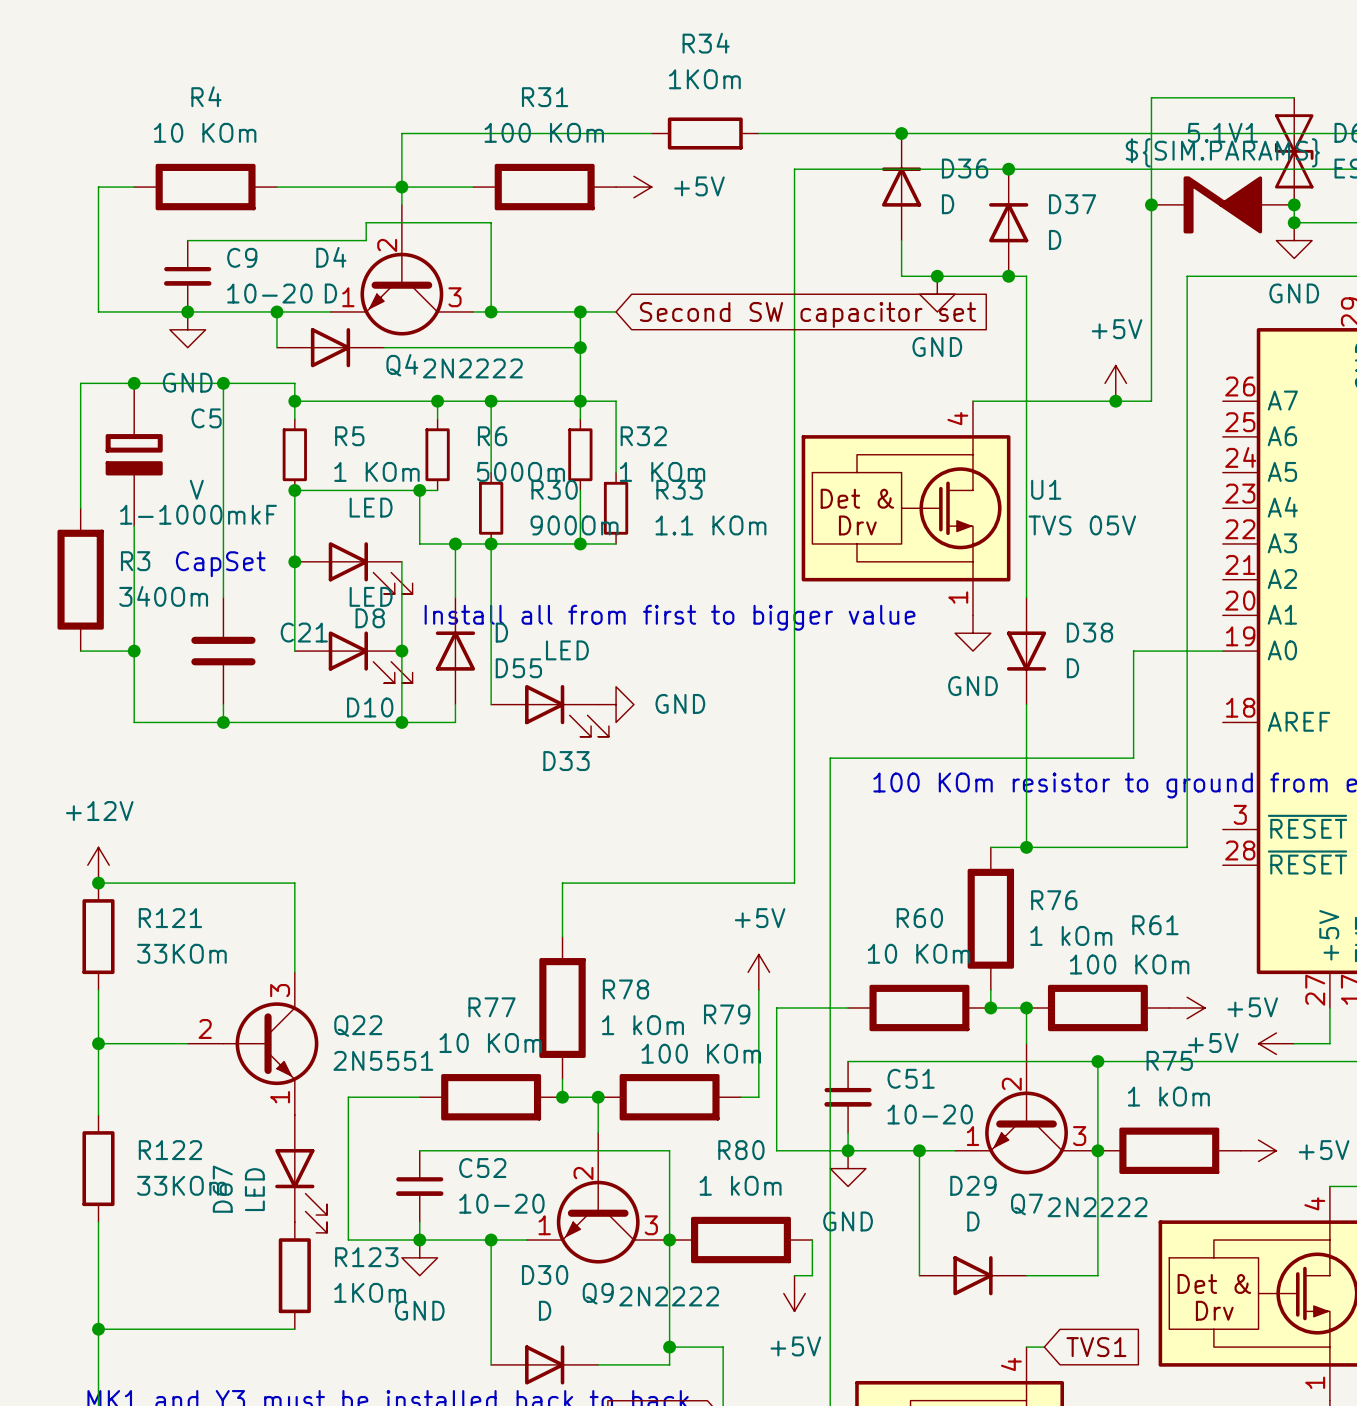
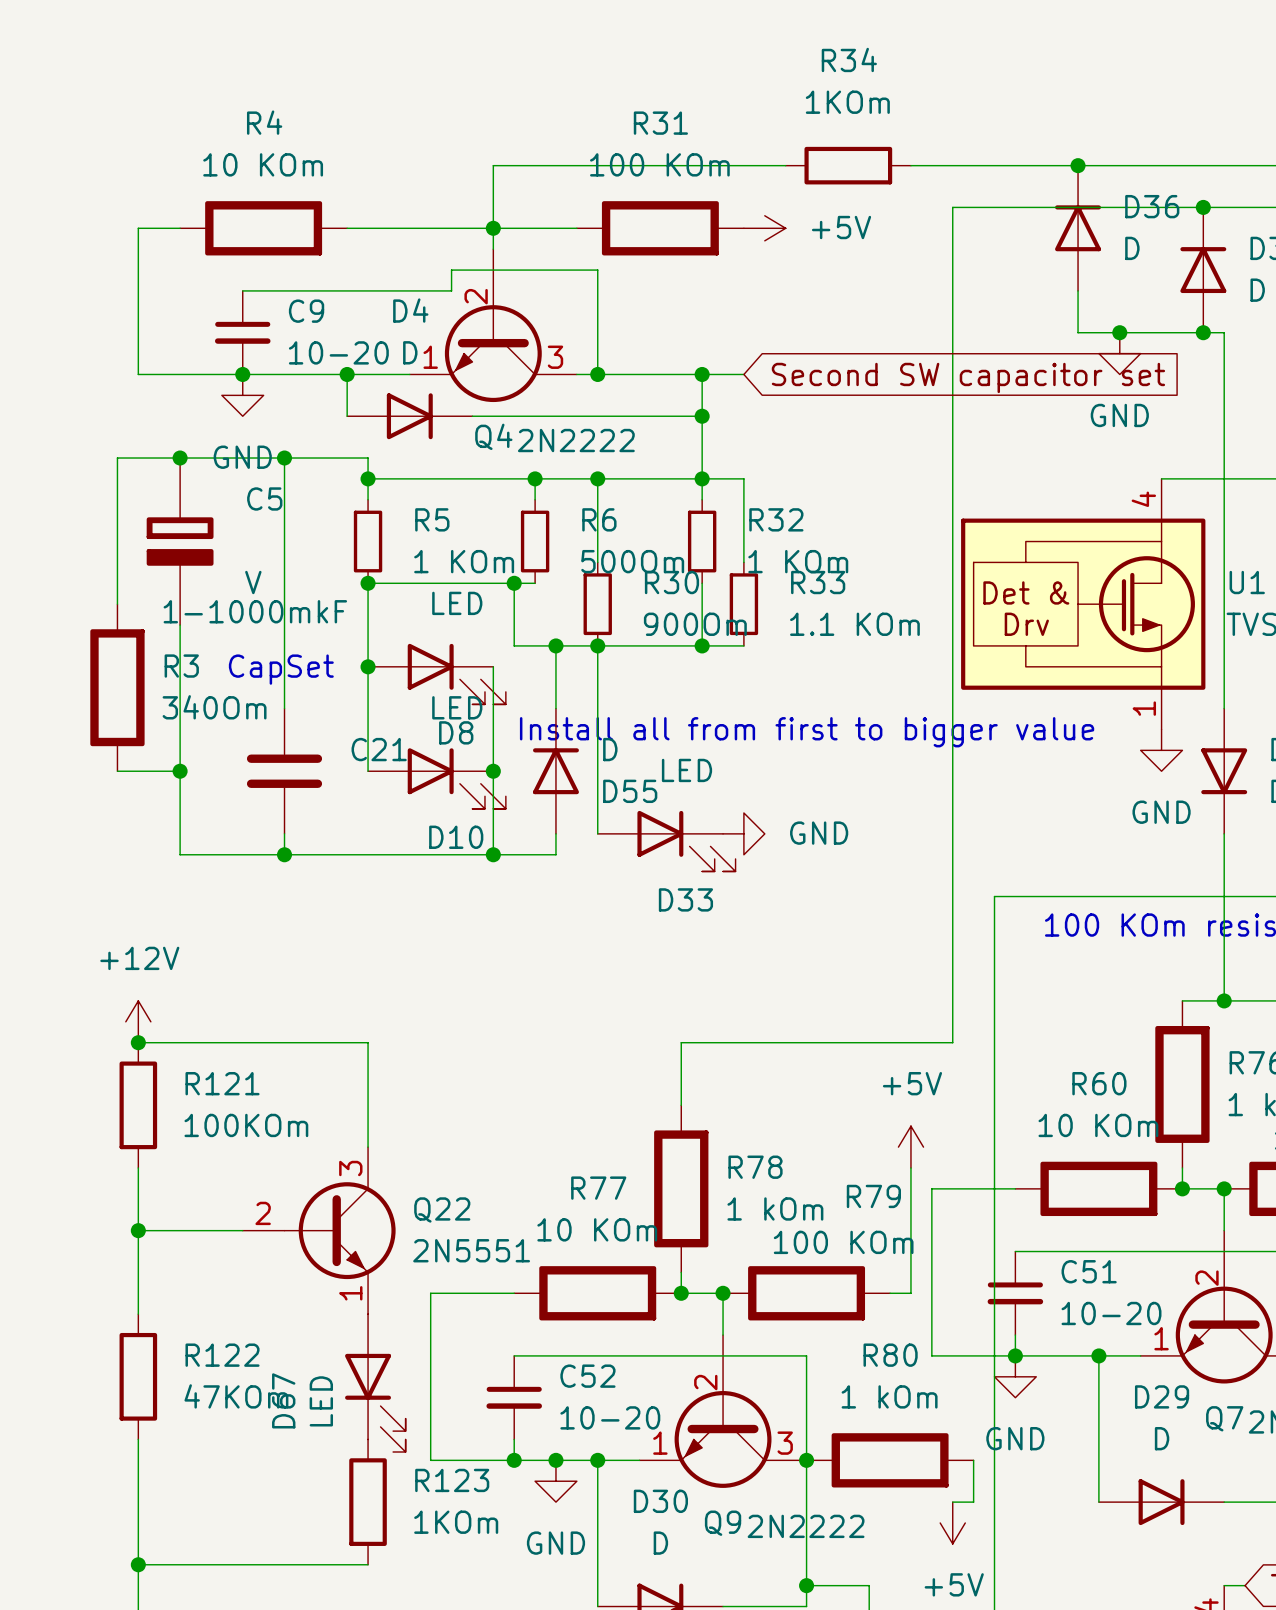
R121 value: 33KOm (181, 953) -> 100KOm (246, 1125)
R122 value: 33KOm (181, 1185) -> 47KOm (236, 1396)
junction: none -> (555, 1460)
power symbol position: GND (419, 1257) -> GND (555, 1481)

